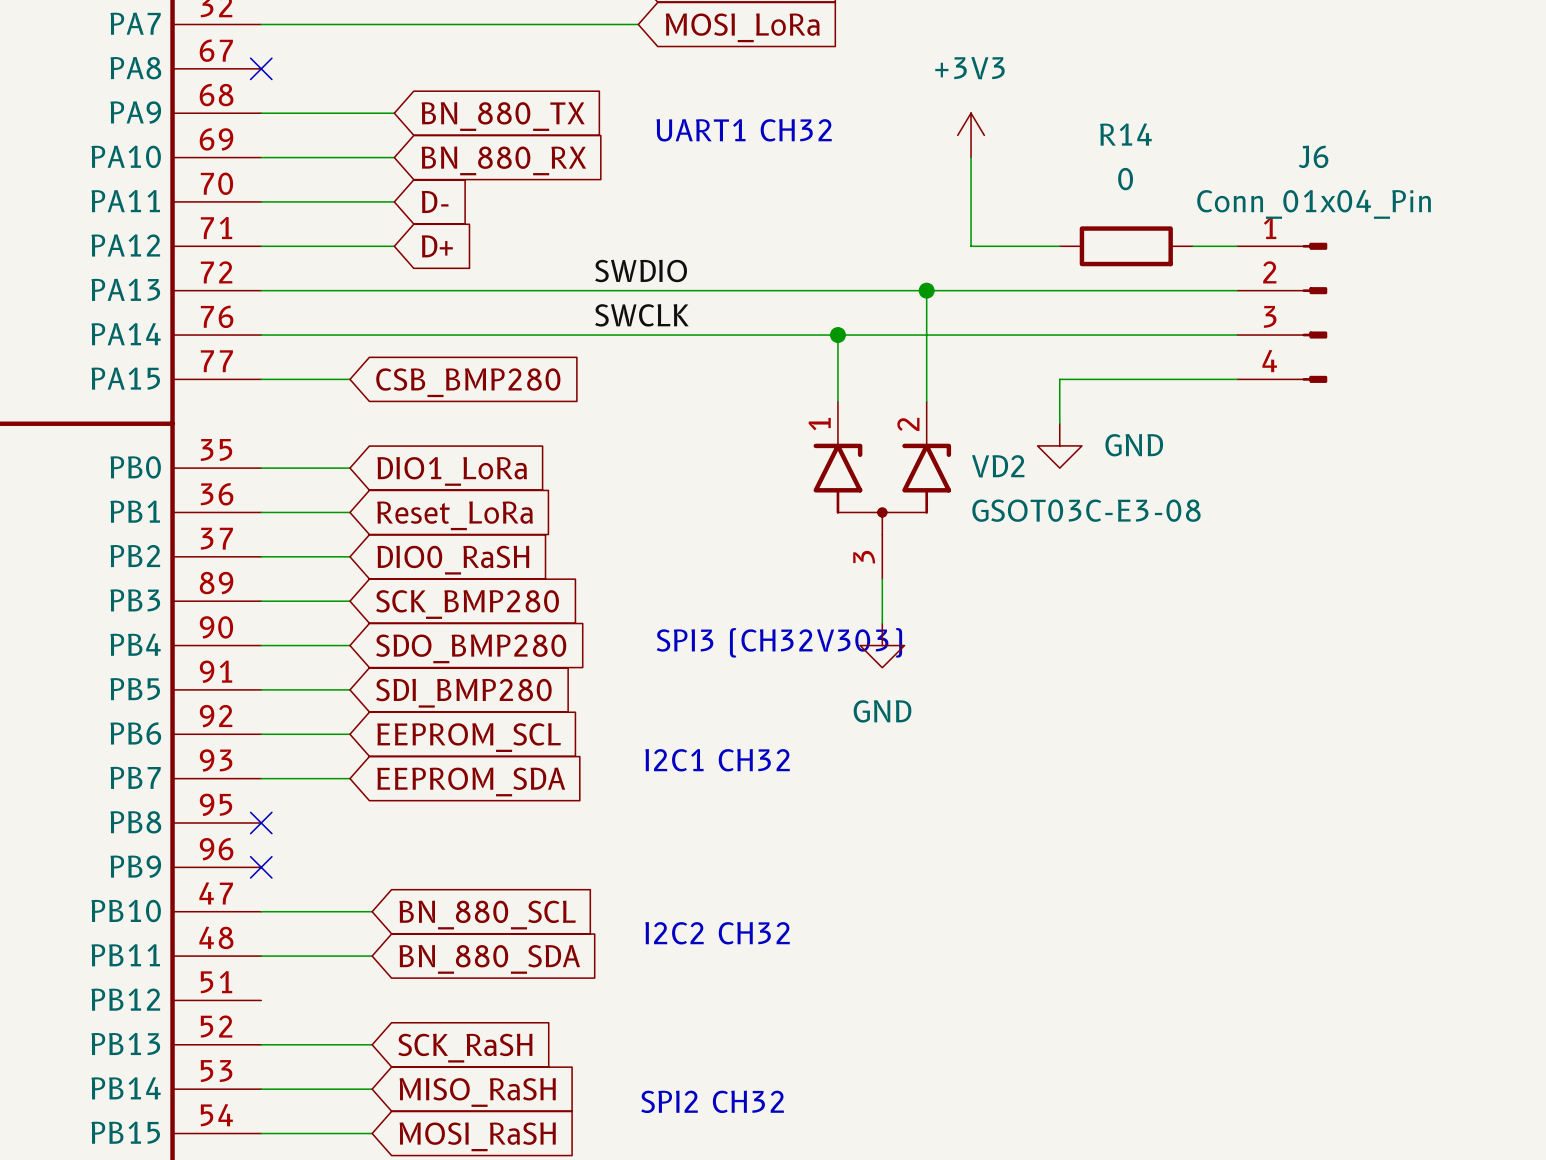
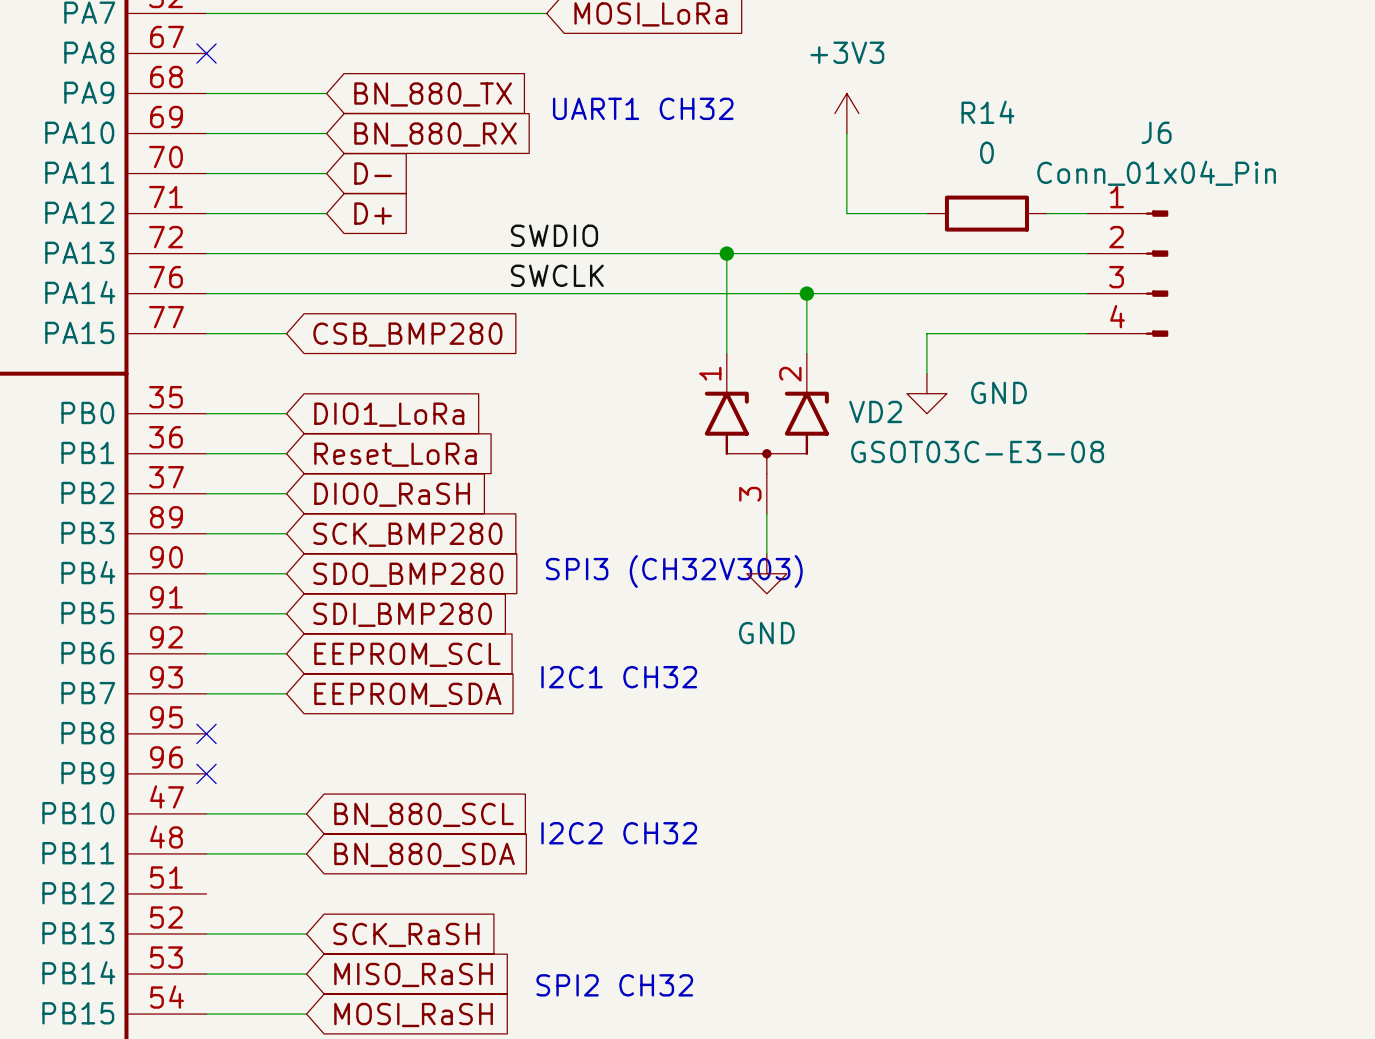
junction: none -> (726, 253)
wire: (926, 290) (926, 335) -> (726, 253) (726, 293)
junction: (926, 290) -> none
junction: (837, 335) -> none
junction: none -> (806, 293)

